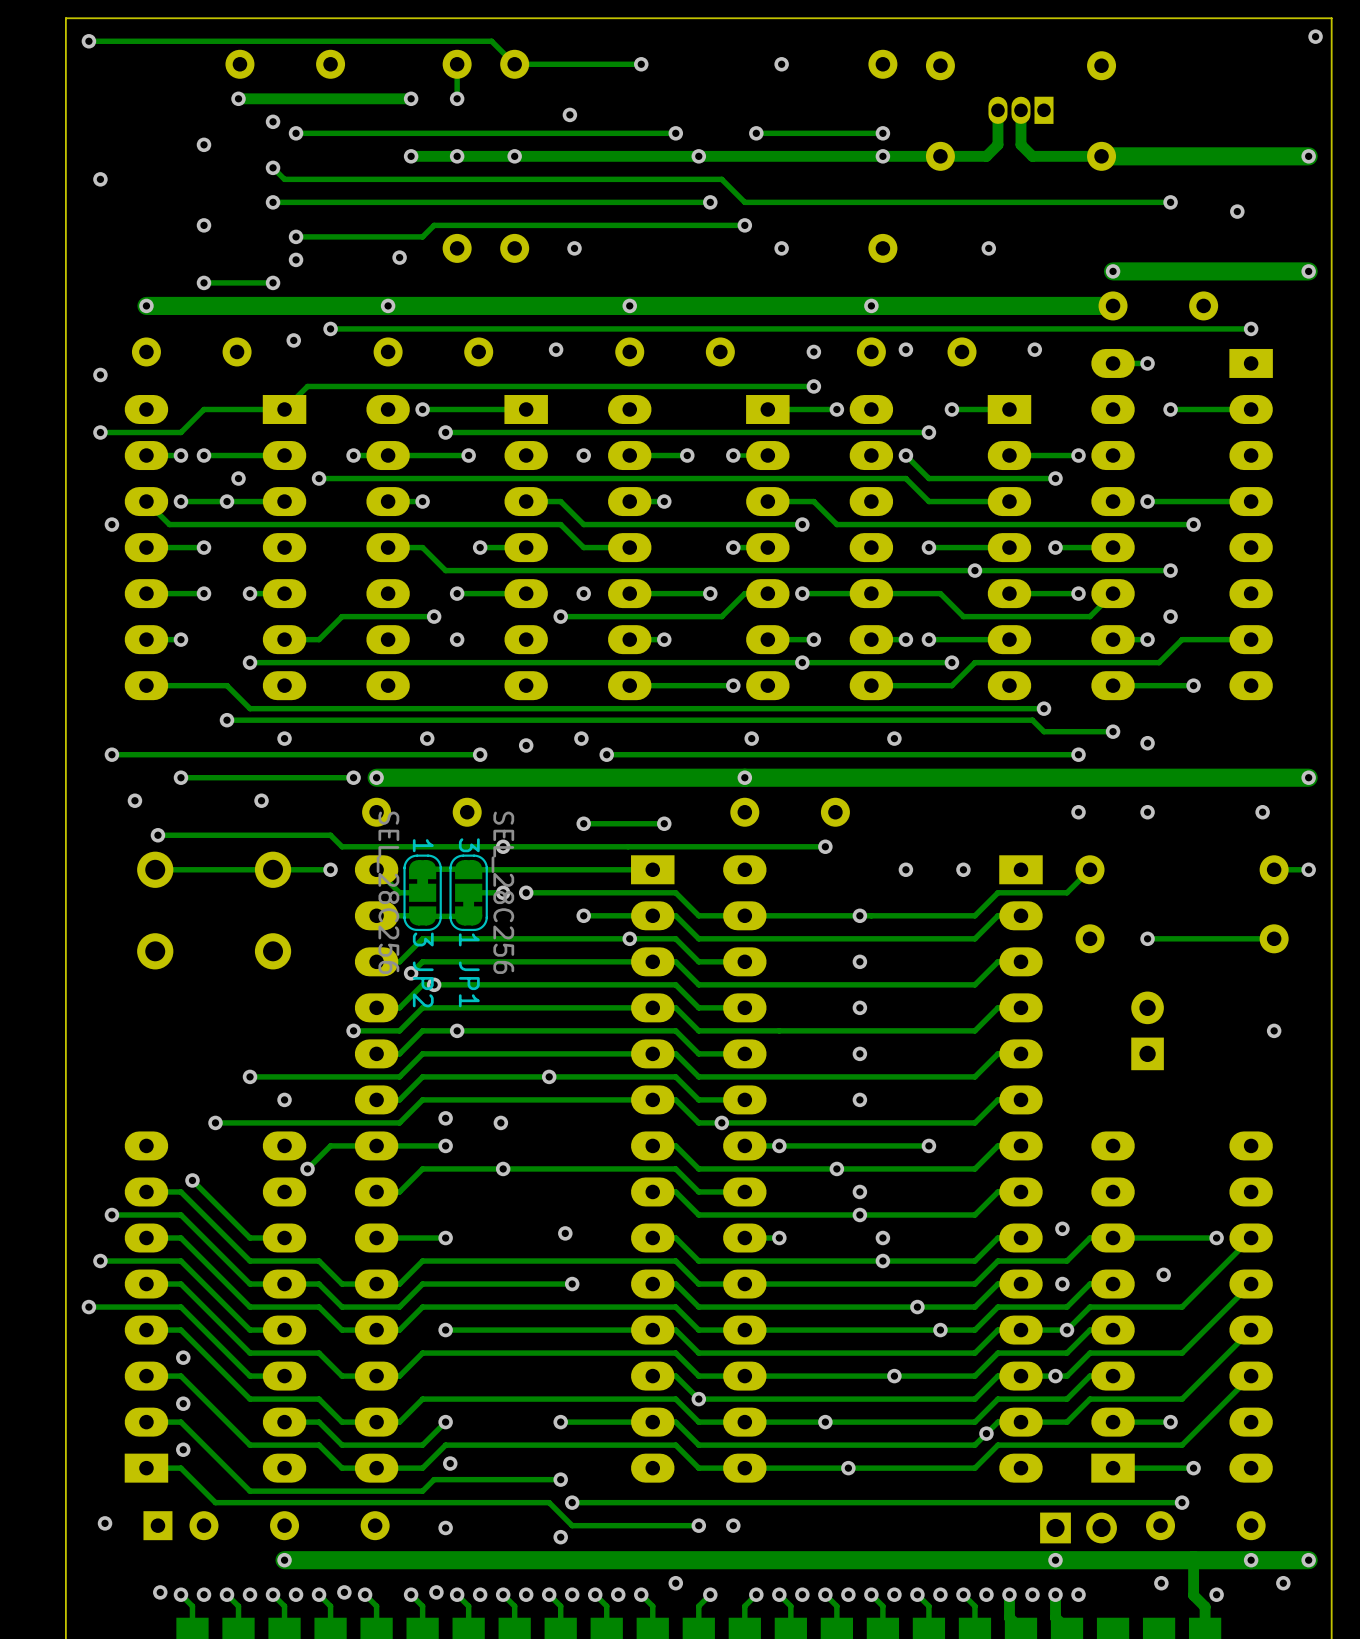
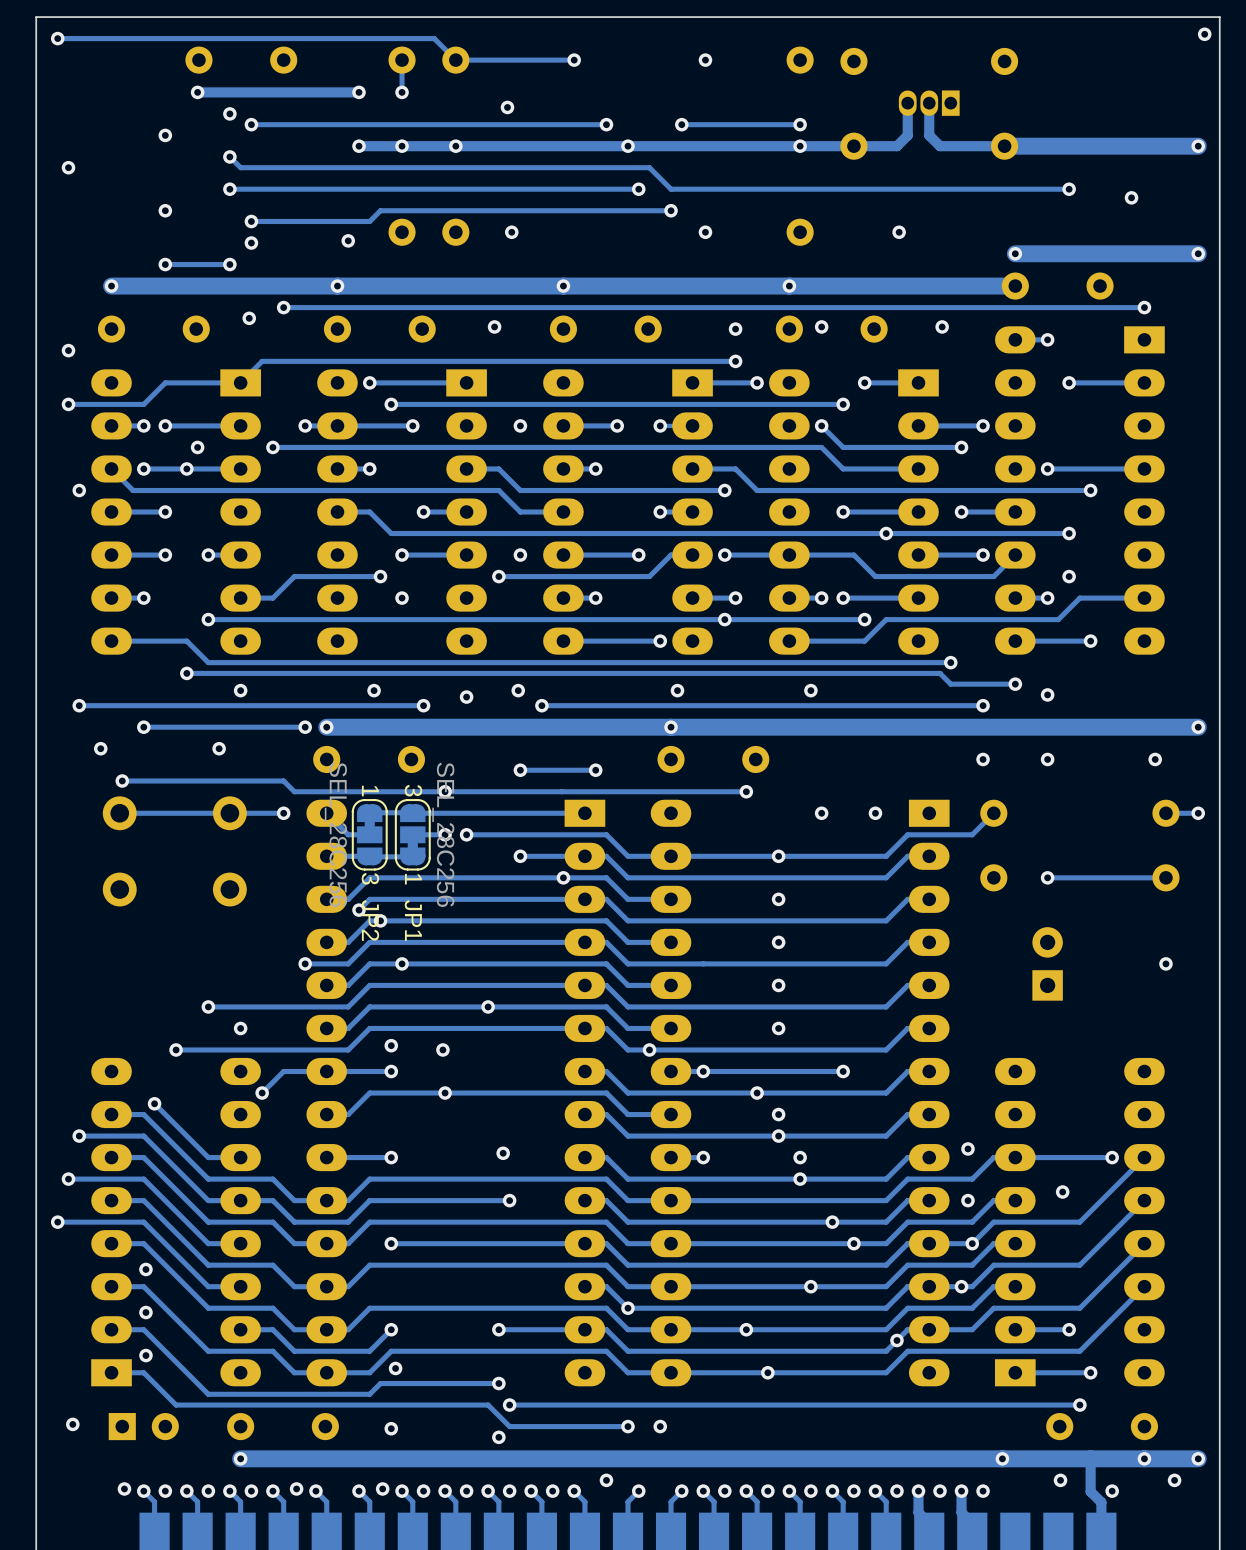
part: (1078, 1527) -> none
via position: (1055, 1560) -> (1002, 1458)

